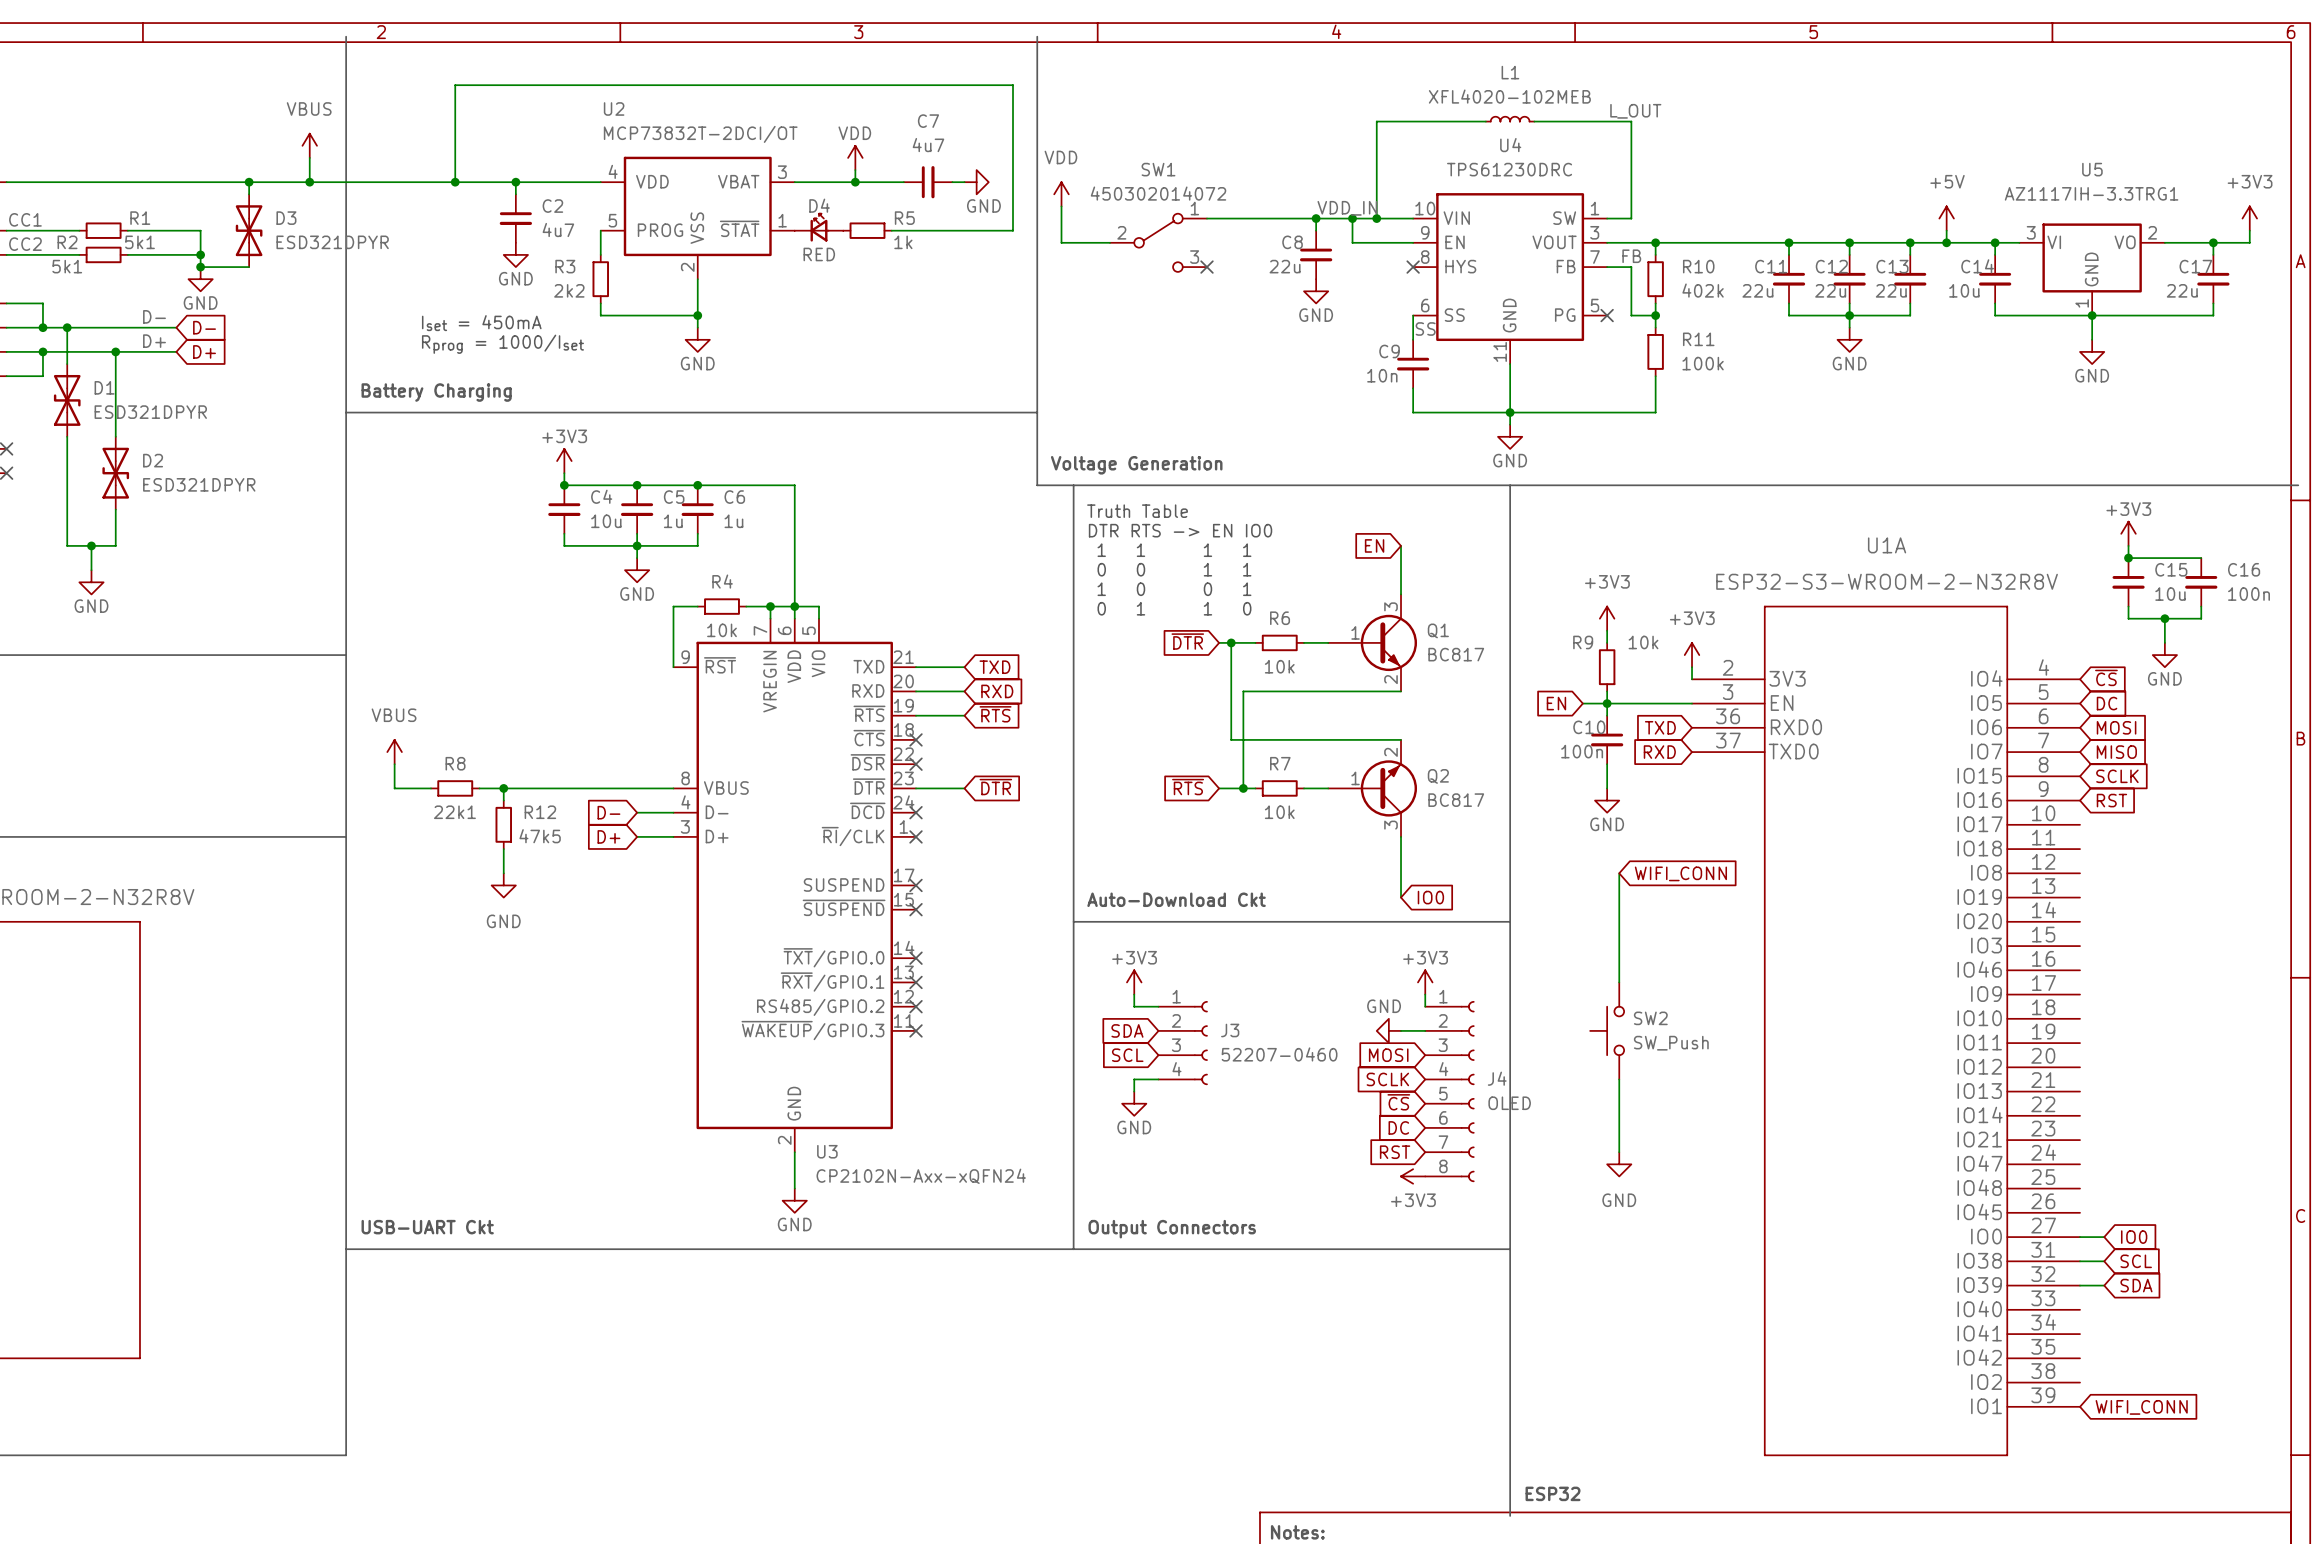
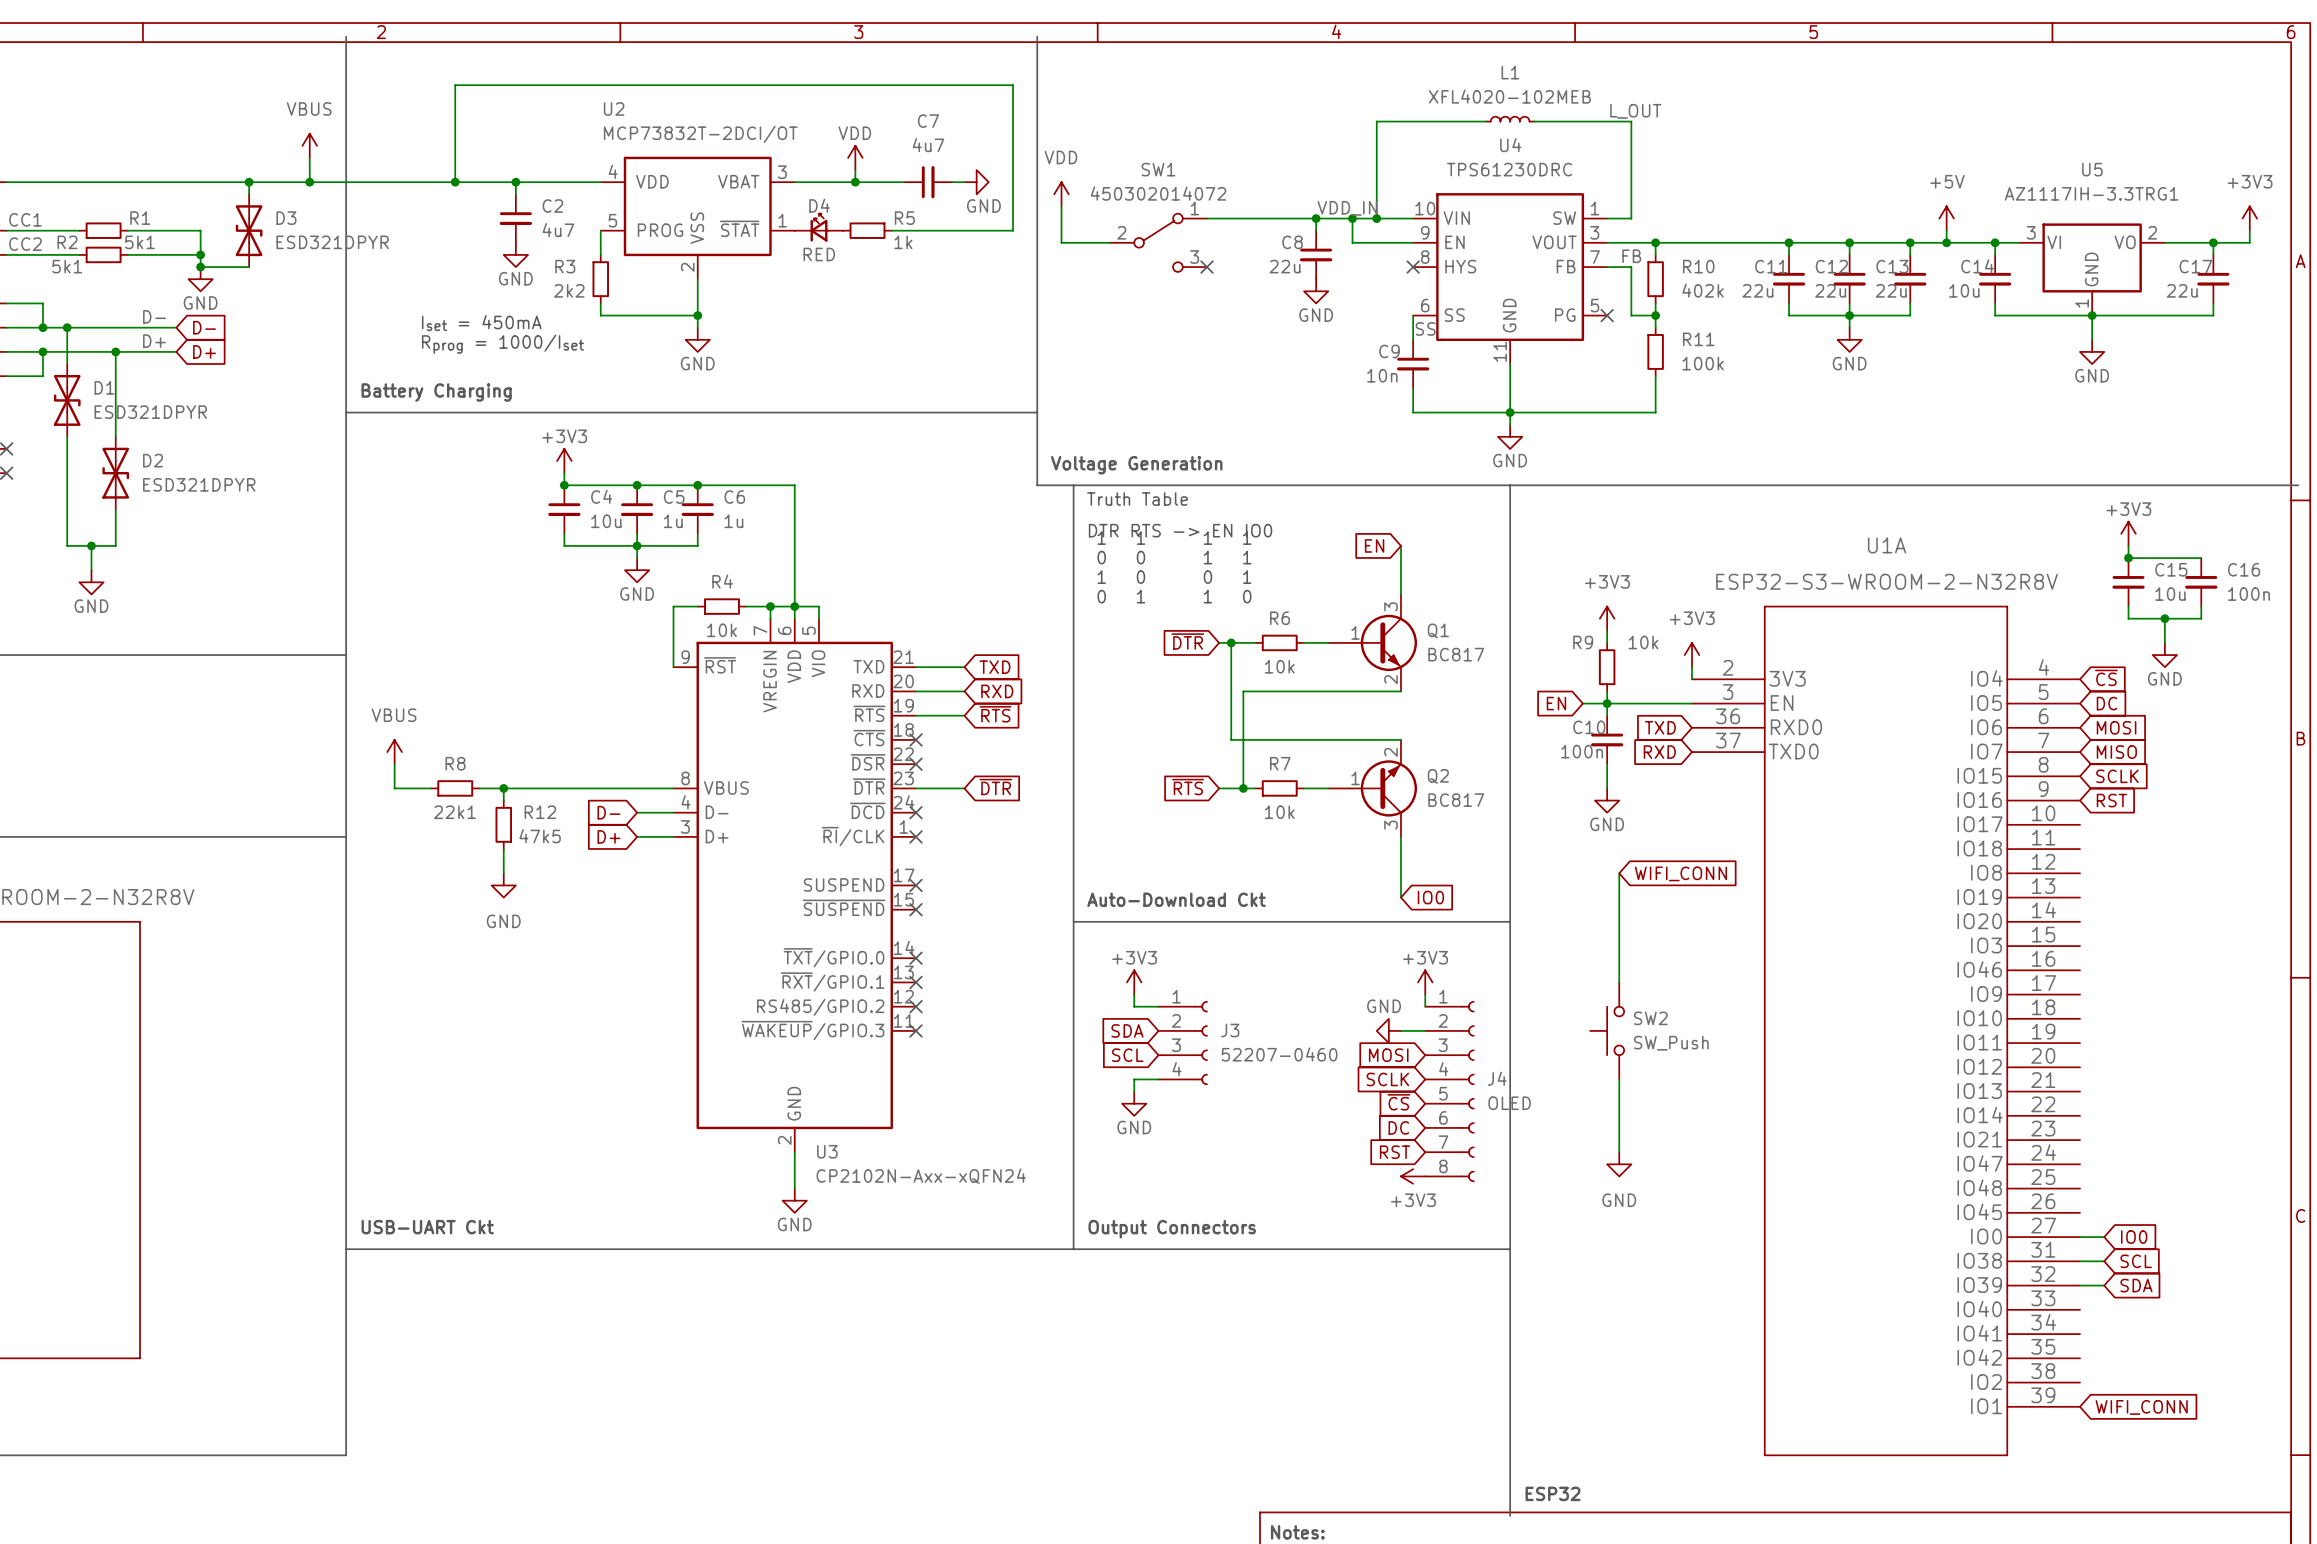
text position: Truth Table (1137, 511) -> Truth Table (1137, 499)
text position: 1 1 1 1 (1174, 550) -> 1 1 1 1 (1174, 538)
text position: 0 0 1 1 (1174, 569) -> 0 0 1 1 (1174, 557)
text position: 1 0 0 1 (1174, 589) -> 1 0 0 1 (1174, 577)
text position: 0 1 1 0 (1174, 608) -> 0 1 1 0 (1174, 596)

